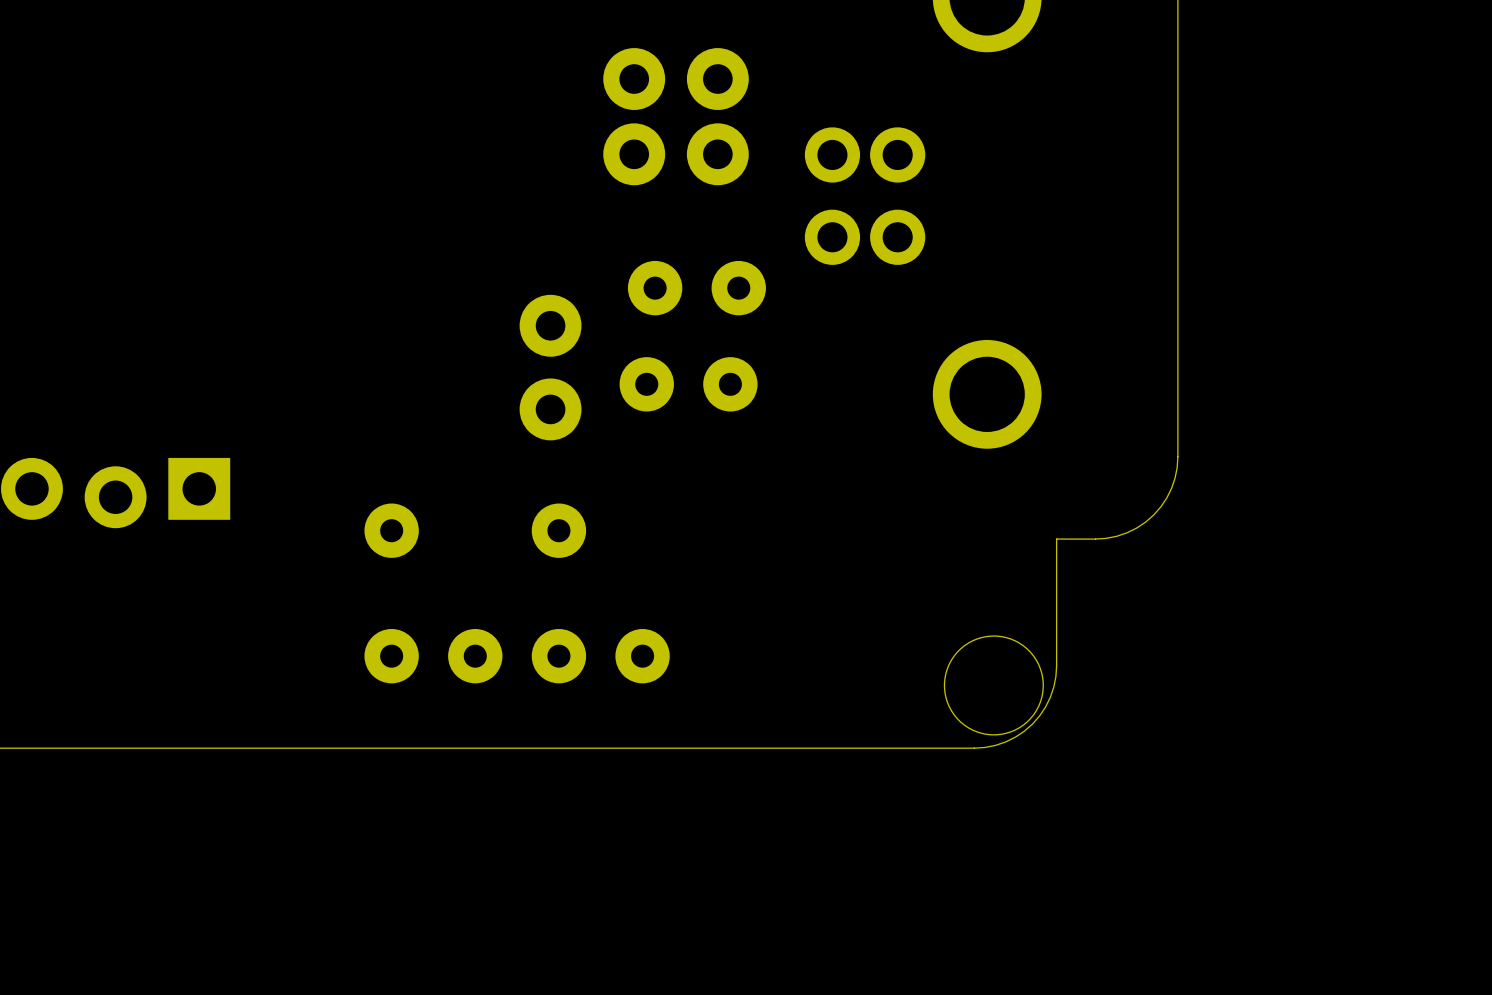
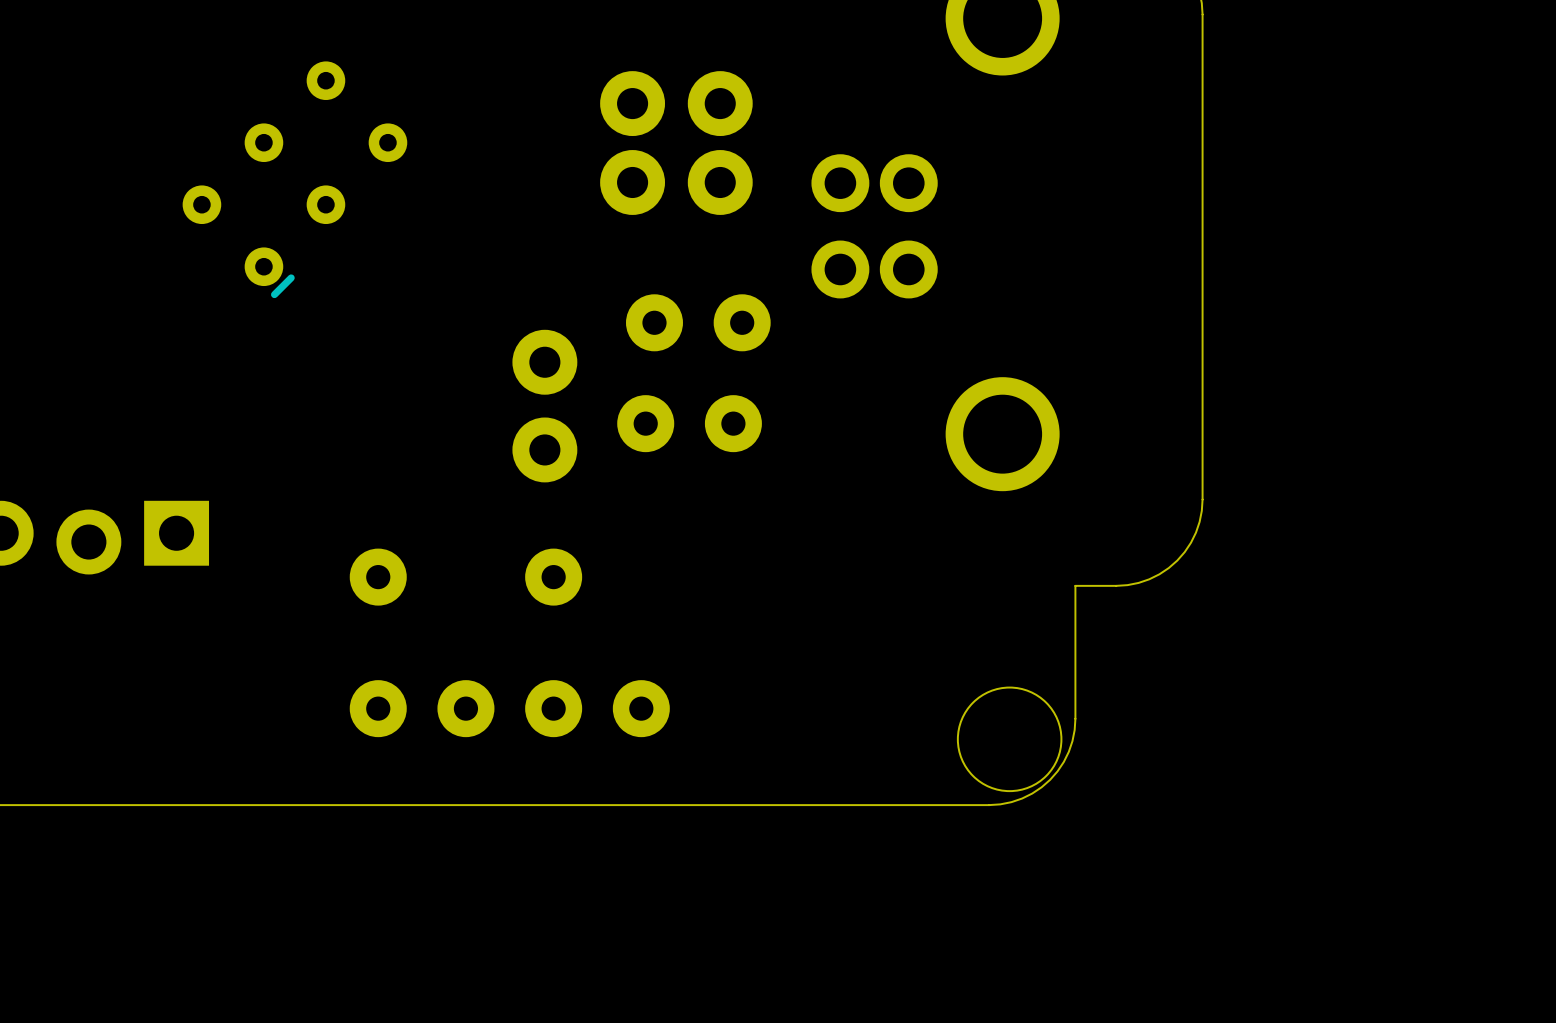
part: none -> (294, 179)

